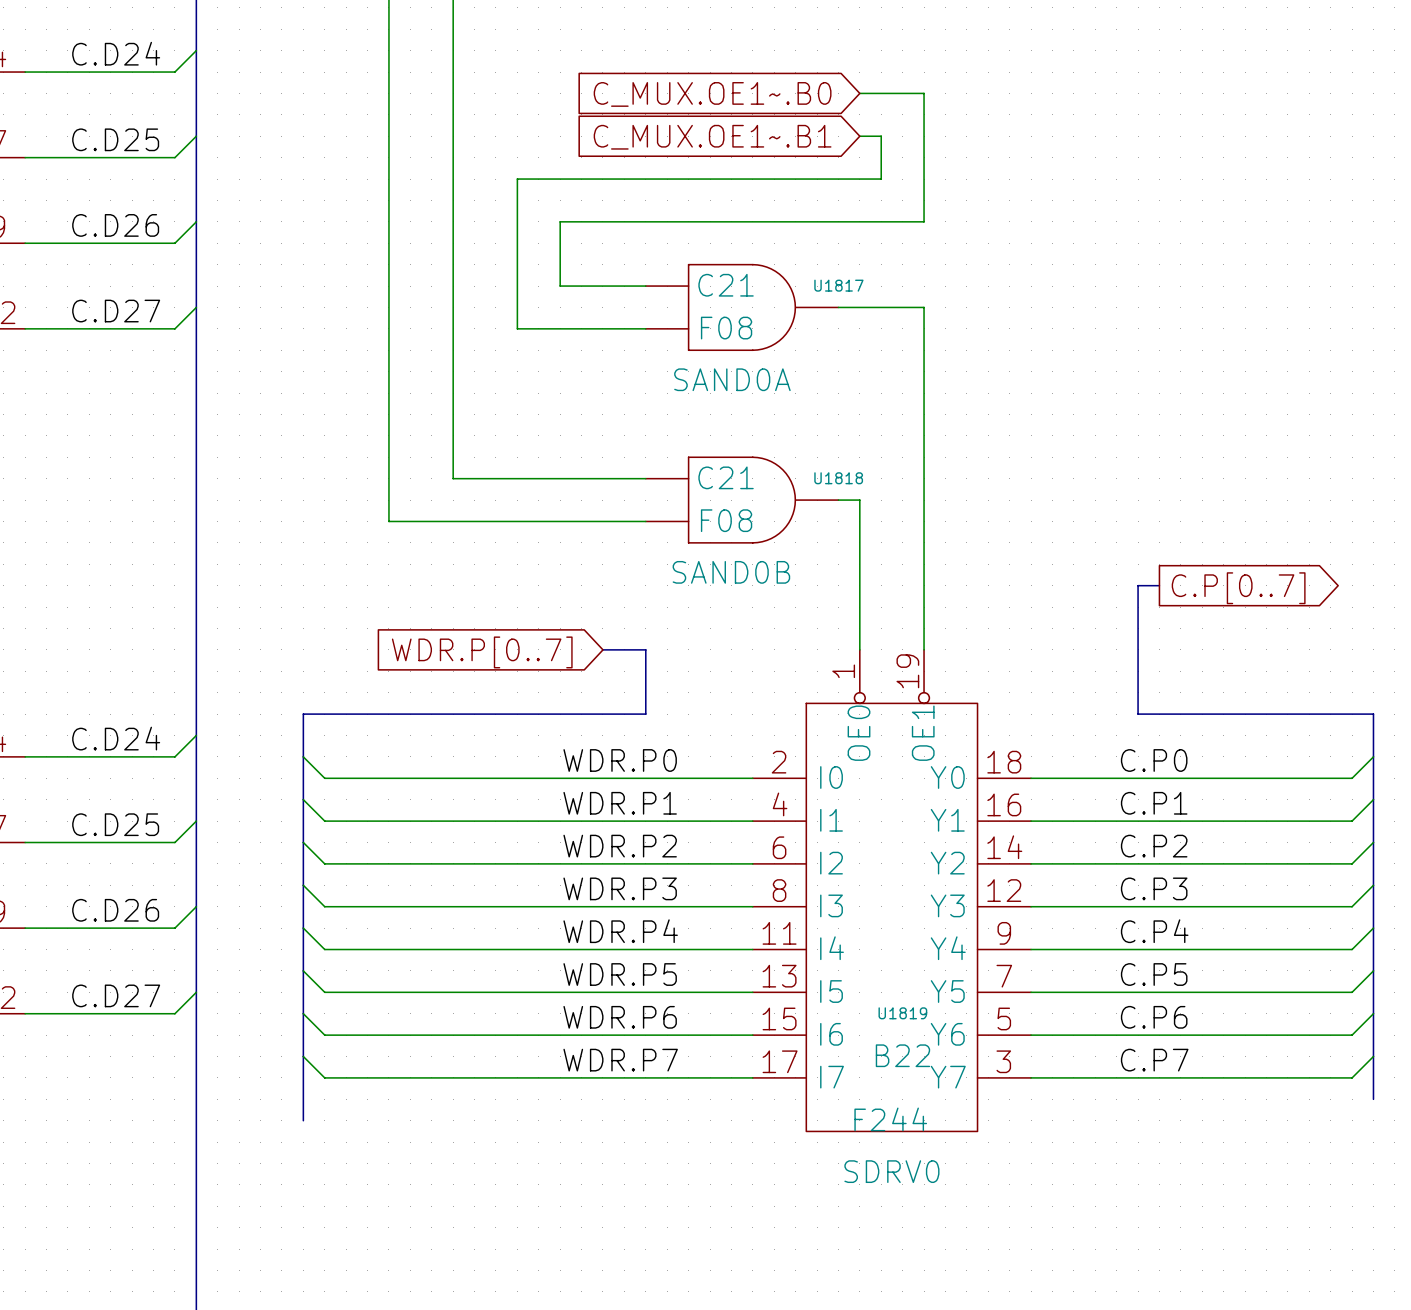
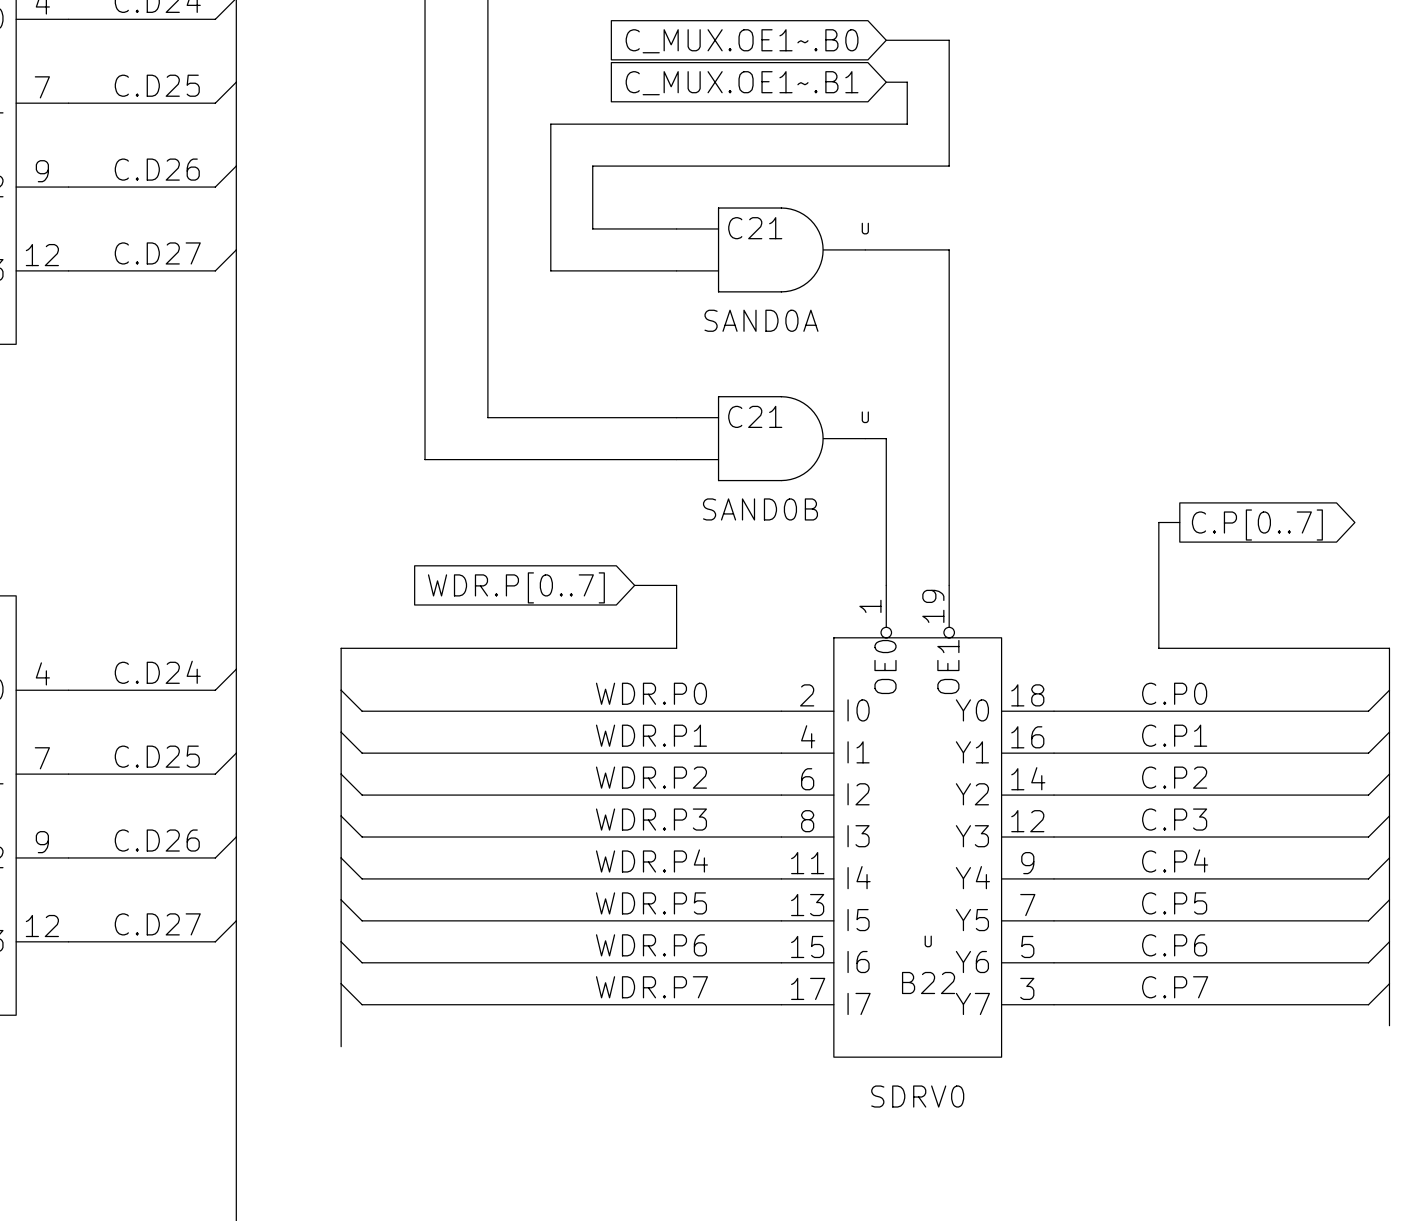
U1817 name: U1817 (838, 285) -> U (865, 228)
U1817 value: F08 (726, 328) -> none
U1818 name: U1818 (838, 478) -> U (865, 417)
U1818 value: F08 (726, 520) -> none
U1819 name: U1819 (902, 1013) -> U (928, 941)
U1819 value: F244 (890, 1119) -> none

